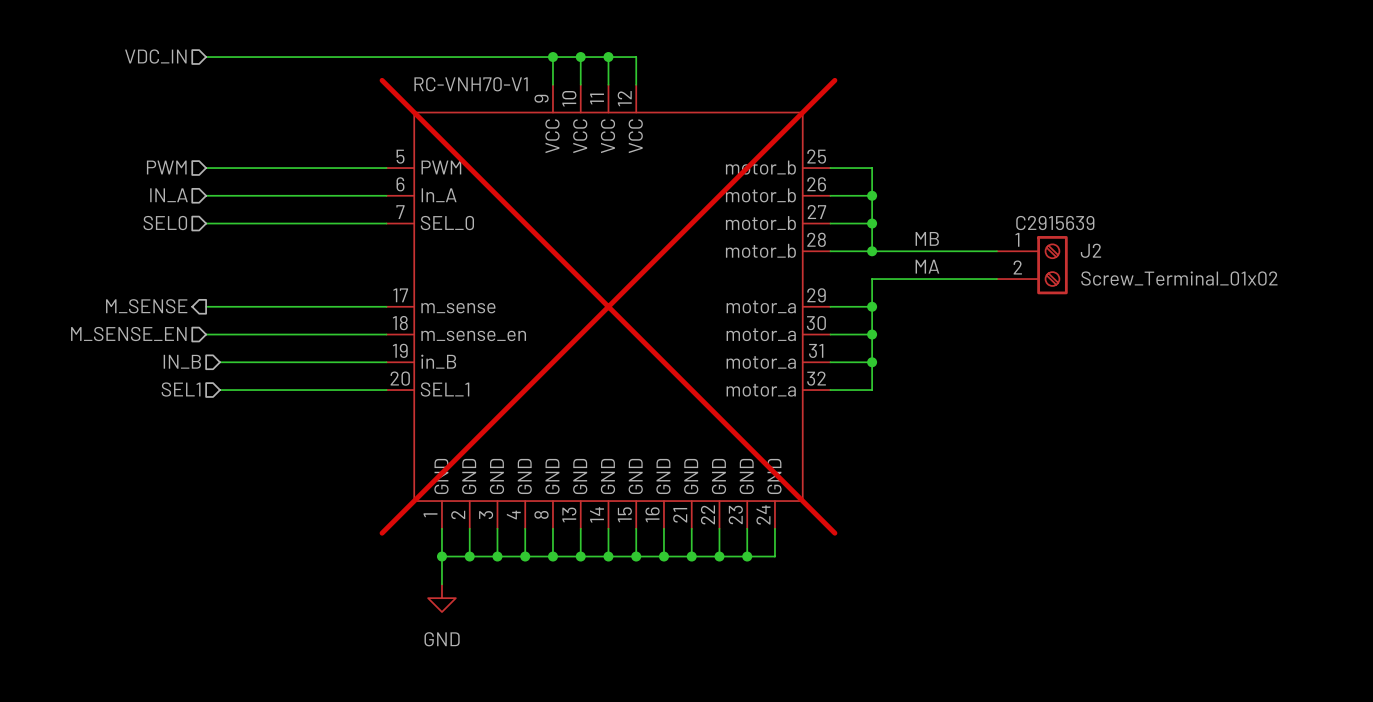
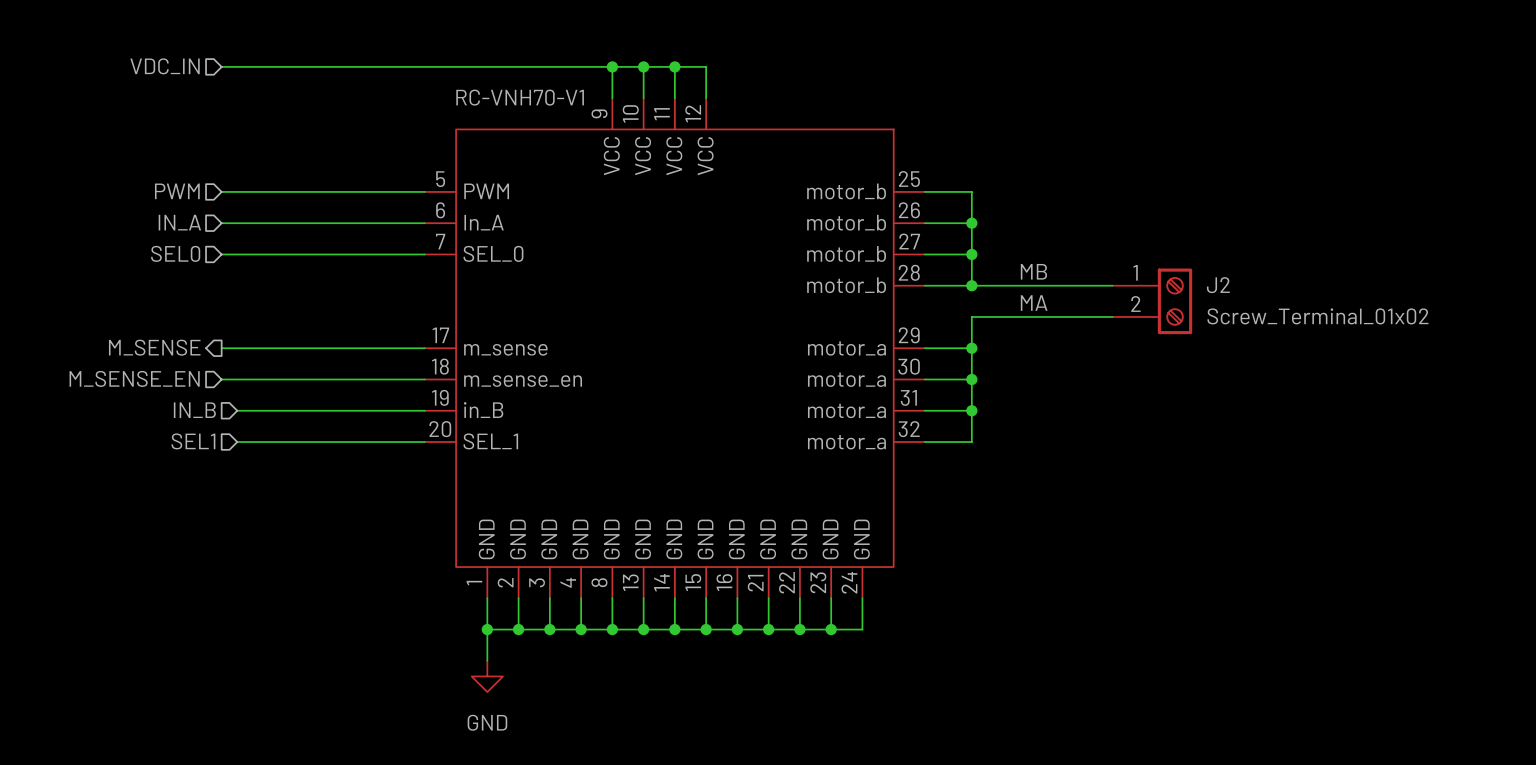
J2 text: C2915639 (1055, 223) -> none
RC-VNH70-V1 do-not-place cross: (608, 306) -> none

